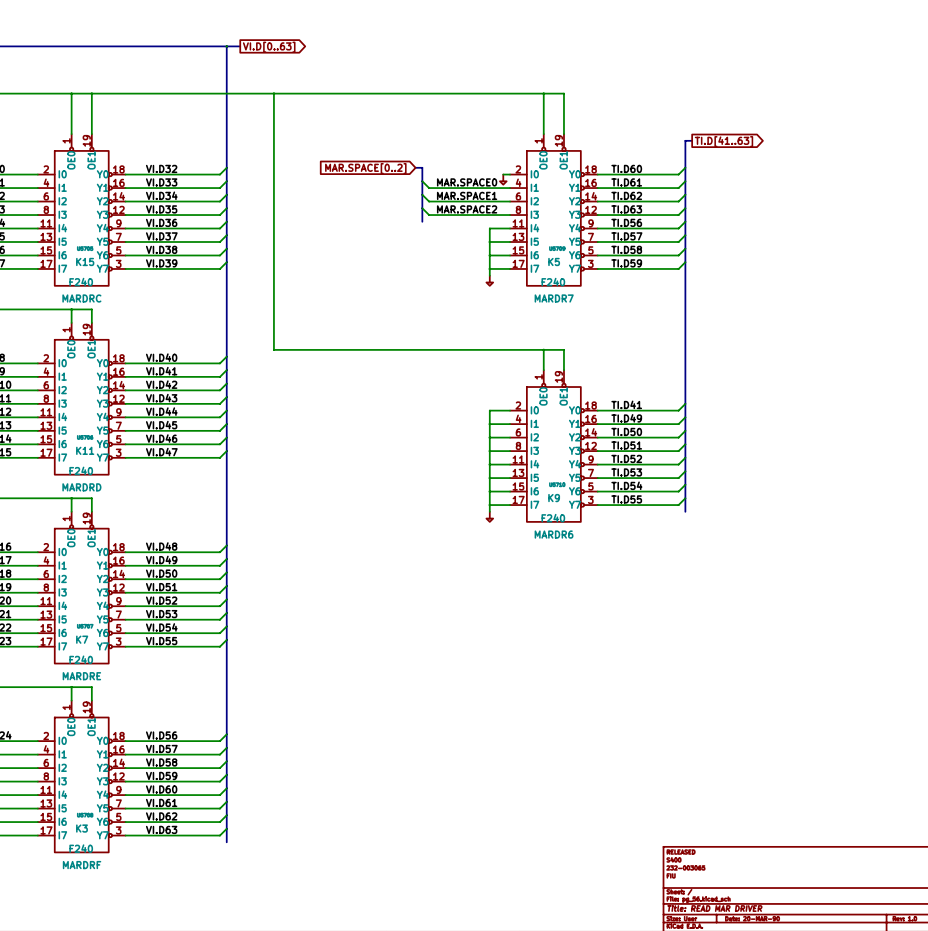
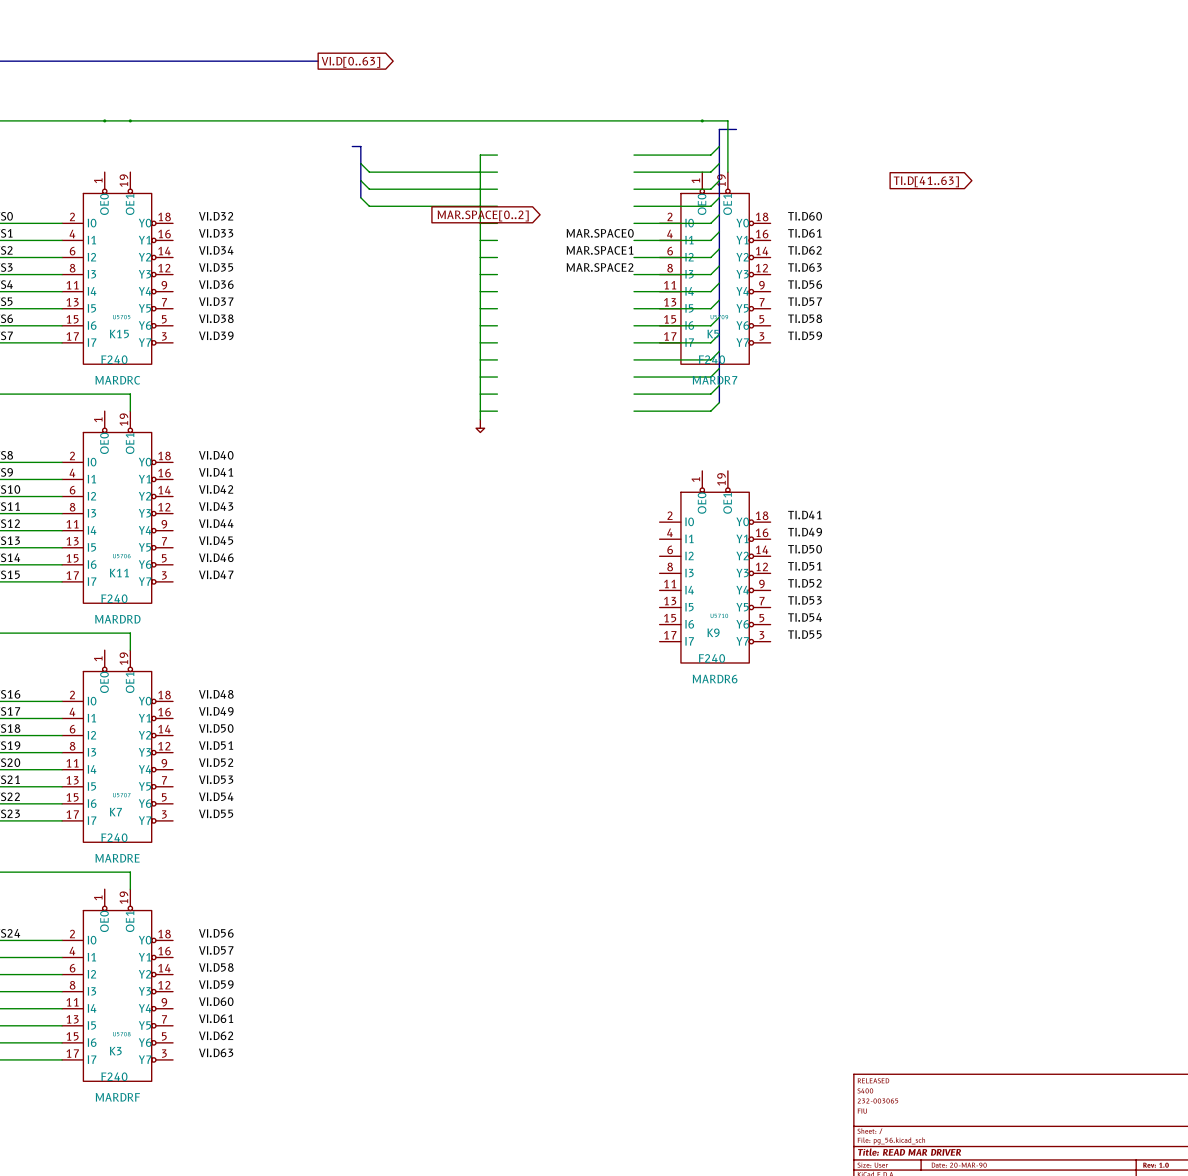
bus: (226, 46) (226, 842) -> none
junction: (226, 46) -> none
wire: (71, 93) (71, 134) -> none
wire: (91, 93) (91, 134) -> none
wire: (273, 93) (273, 349) (563, 349) (563, 370) -> none
wire: (543, 93) (543, 134) -> none
bus: none -> (736, 129) (719, 129) (719, 402)
bus: none -> (352, 146) (360, 146) (360, 197)
wire: none -> (719, 146) (710, 155) (634, 155)
wire: none -> (497, 155) (480, 155) (480, 419)
wire: none -> (360, 163) (369, 172) (497, 172)
wire: none -> (719, 163) (710, 172) (634, 172)
wire: none -> (360, 180) (369, 189) (497, 189)
wire: none -> (719, 180) (710, 189) (634, 189)
bus: (692, 140) (685, 140) (685, 511) -> none
wire: none -> (360, 197) (369, 206) (497, 206)
wire: none -> (719, 197) (710, 206) (634, 206)
wire: (226, 167) (220, 174) (125, 174) -> none
bus: (415, 167) (422, 167) (422, 221) -> none
wire: none -> (719, 214) (710, 223) (659, 223)
wire: (685, 167) (678, 174) (597, 174) -> none
wire: none -> (480, 223) (497, 223)
wire: none -> (634, 223) (651, 223)
power symbol: (503, 179) -> none
wire: (226, 181) (220, 188) (125, 188) -> none
wire: (422, 181) (429, 188) (489, 188) -> none
wire: none -> (719, 231) (710, 240) (659, 240)
wire: (685, 181) (678, 188) (597, 188) -> none
wire: none -> (480, 240) (497, 240)
wire: (226, 194) (220, 201) (125, 201) -> none
wire: (422, 194) (429, 201) (489, 201) -> none
wire: none -> (719, 248) (710, 257) (659, 257)
wire: (685, 194) (678, 201) (597, 201) -> none
wire: none -> (480, 257) (497, 257)
wire: (226, 208) (220, 215) (125, 215) -> none
wire: (422, 208) (429, 215) (489, 215) -> none
wire: none -> (719, 266) (710, 274) (659, 274)
wire: (685, 208) (678, 215) (597, 215) -> none
wire: none -> (480, 274) (497, 274)
wire: (226, 221) (220, 228) (125, 228) -> none
wire: none -> (719, 283) (710, 291) (659, 291)
wire: (685, 221) (678, 228) (597, 228) -> none
wire: none -> (480, 291) (497, 291)
wire: (489, 228) (489, 275) -> none
wire: (226, 235) (220, 242) (125, 242) -> none
wire: none -> (719, 300) (710, 308) (659, 308)
wire: (685, 235) (678, 242) (597, 242) -> none
wire: none -> (480, 308) (497, 308)
wire: (226, 248) (220, 255) (125, 255) -> none
wire: none -> (719, 317) (710, 325) (659, 325)
wire: (685, 248) (678, 255) (597, 255) -> none
wire: none -> (480, 325) (497, 325)
wire: (226, 262) (220, 268) (125, 268) -> none
wire: none -> (719, 334) (710, 342) (659, 342)
wire: (685, 262) (678, 268) (597, 268) -> none
wire: none -> (480, 342) (497, 342)
wire: none -> (719, 351) (710, 359) (634, 359)
power symbol: (489, 280) -> none
wire: none -> (480, 359) (497, 359)
wire: none -> (719, 368) (710, 377) (634, 377)
wire: none -> (480, 377) (497, 377)
wire: none -> (719, 385) (710, 394) (634, 394)
wire: (71, 309) (71, 322) -> none
wire: none -> (480, 394) (497, 394)
wire: none -> (719, 402) (710, 411) (634, 411)
wire: none -> (480, 411) (497, 411)
power symbol: none -> (480, 426)
wire: (543, 349) (543, 370) -> none
wire: (226, 356) (220, 363) (125, 363) -> none
wire: (226, 370) (220, 376) (125, 376) -> none
wire: (226, 383) (220, 390) (125, 390) -> none
wire: (226, 397) (220, 403) (125, 403) -> none
wire: (685, 403) (678, 410) (597, 410) -> none
wire: (226, 410) (220, 417) (125, 417) -> none
wire: (510, 410) (489, 410) (489, 511) -> none
wire: (685, 417) (678, 424) (597, 424) -> none
wire: (226, 424) (220, 430) (125, 430) -> none
wire: (489, 424) (510, 424) -> none
wire: (685, 430) (678, 437) (597, 437) -> none
wire: (226, 437) (220, 444) (125, 444) -> none
wire: (489, 437) (510, 437) -> none
wire: (685, 444) (678, 451) (597, 451) -> none
wire: (226, 451) (220, 457) (125, 457) -> none
wire: (489, 451) (510, 451) -> none
wire: (685, 457) (678, 464) (597, 464) -> none
wire: (489, 464) (510, 464) -> none
wire: (685, 471) (678, 478) (597, 478) -> none
wire: (489, 478) (510, 478) -> none
wire: (685, 484) (678, 491) (597, 491) -> none
wire: (489, 491) (510, 491) -> none
wire: (71, 498) (71, 511) -> none
wire: (685, 498) (678, 505) (597, 505) -> none
wire: (489, 505) (510, 505) -> none
power symbol: (489, 516) -> none
wire: (226, 545) (220, 552) (125, 552) -> none
wire: (226, 559) (220, 565) (125, 565) -> none
wire: (226, 572) (220, 579) (125, 579) -> none
wire: (226, 585) (220, 592) (125, 592) -> none
wire: (226, 599) (220, 606) (125, 606) -> none
wire: (226, 612) (220, 619) (125, 619) -> none
wire: (226, 626) (220, 633) (125, 633) -> none
wire: (226, 639) (220, 646) (125, 646) -> none
wire: (71, 687) (71, 700) -> none
wire: (226, 734) (220, 741) (125, 741) -> none
wire: (226, 747) (220, 754) (125, 754) -> none
wire: (226, 761) (220, 768) (125, 768) -> none
wire: (226, 774) (220, 781) (125, 781) -> none
wire: (226, 788) (220, 795) (125, 795) -> none
wire: (226, 801) (220, 808) (125, 808) -> none
wire: (226, 815) (220, 822) (125, 822) -> none
wire: (226, 828) (220, 835) (125, 835) -> none

